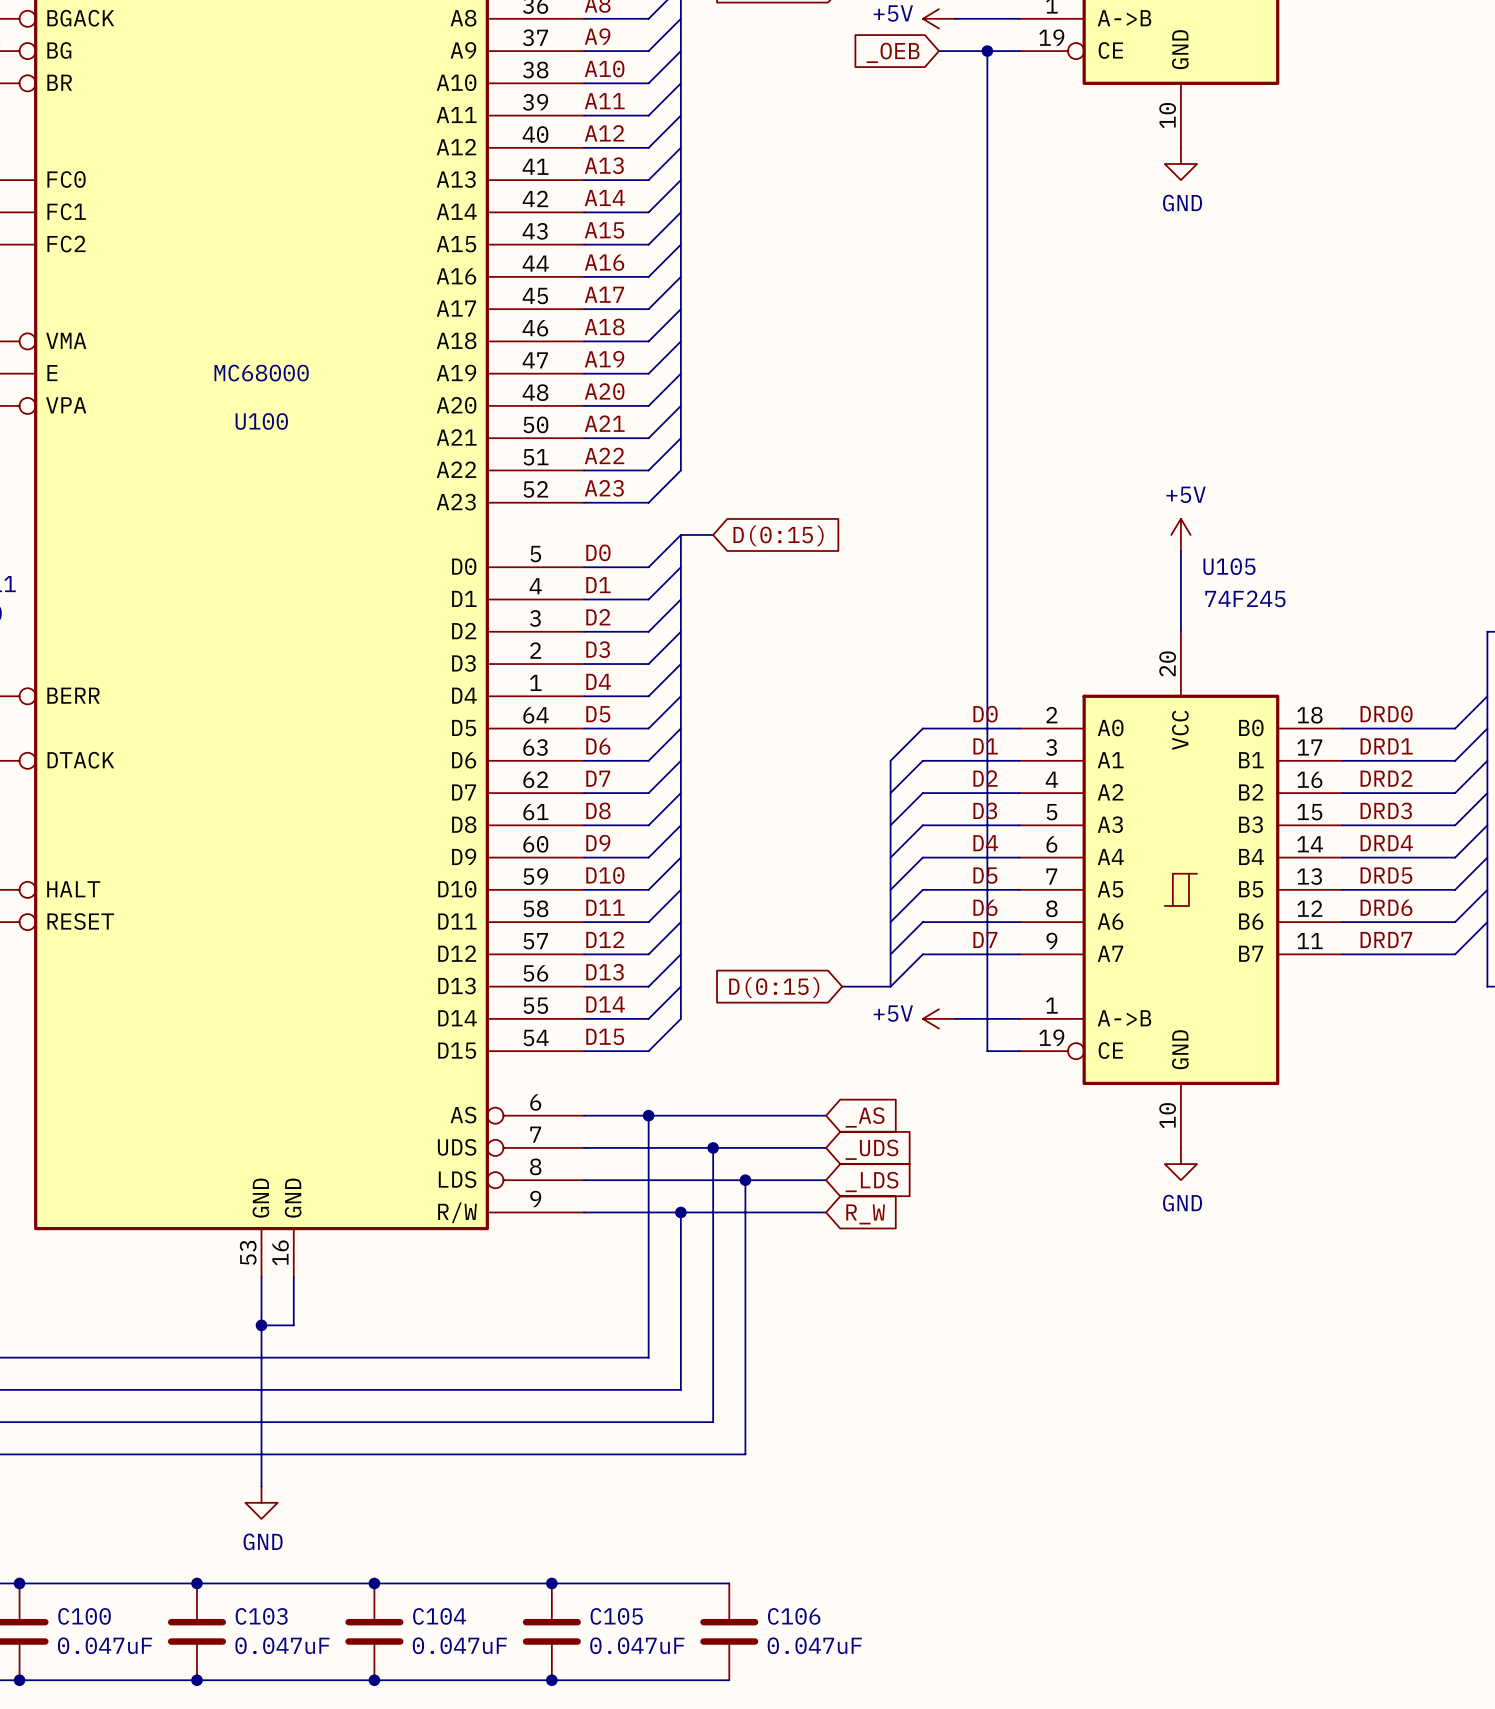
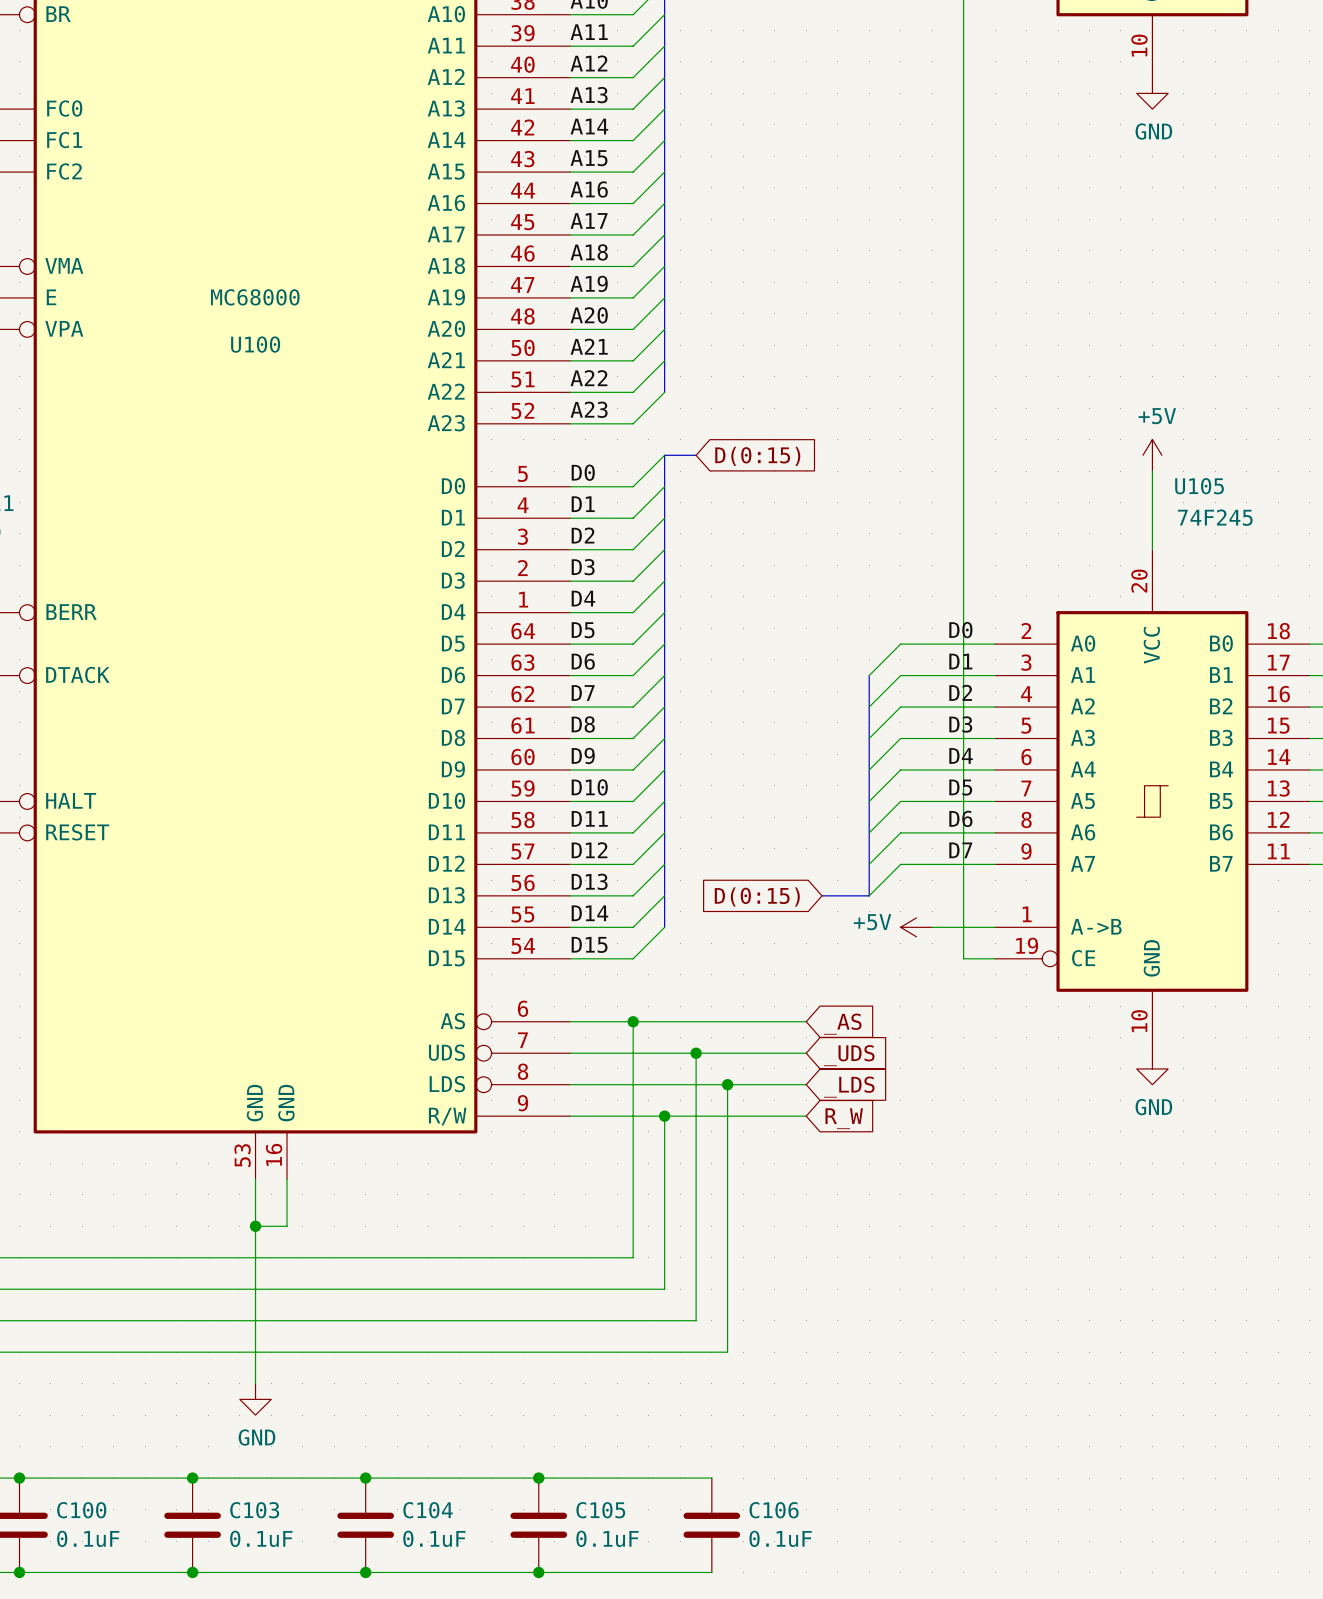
C100 value: 0.047uF (105, 1645) -> 0.1uF (88, 1538)
C103 value: 0.047uF (282, 1645) -> 0.1uF (261, 1538)
C104 value: 0.047uF (459, 1645) -> 0.1uF (434, 1538)
C105 value: 0.047uF (637, 1645) -> 0.1uF (607, 1538)
C106 value: 0.047uF (814, 1645) -> 0.1uF (780, 1538)

